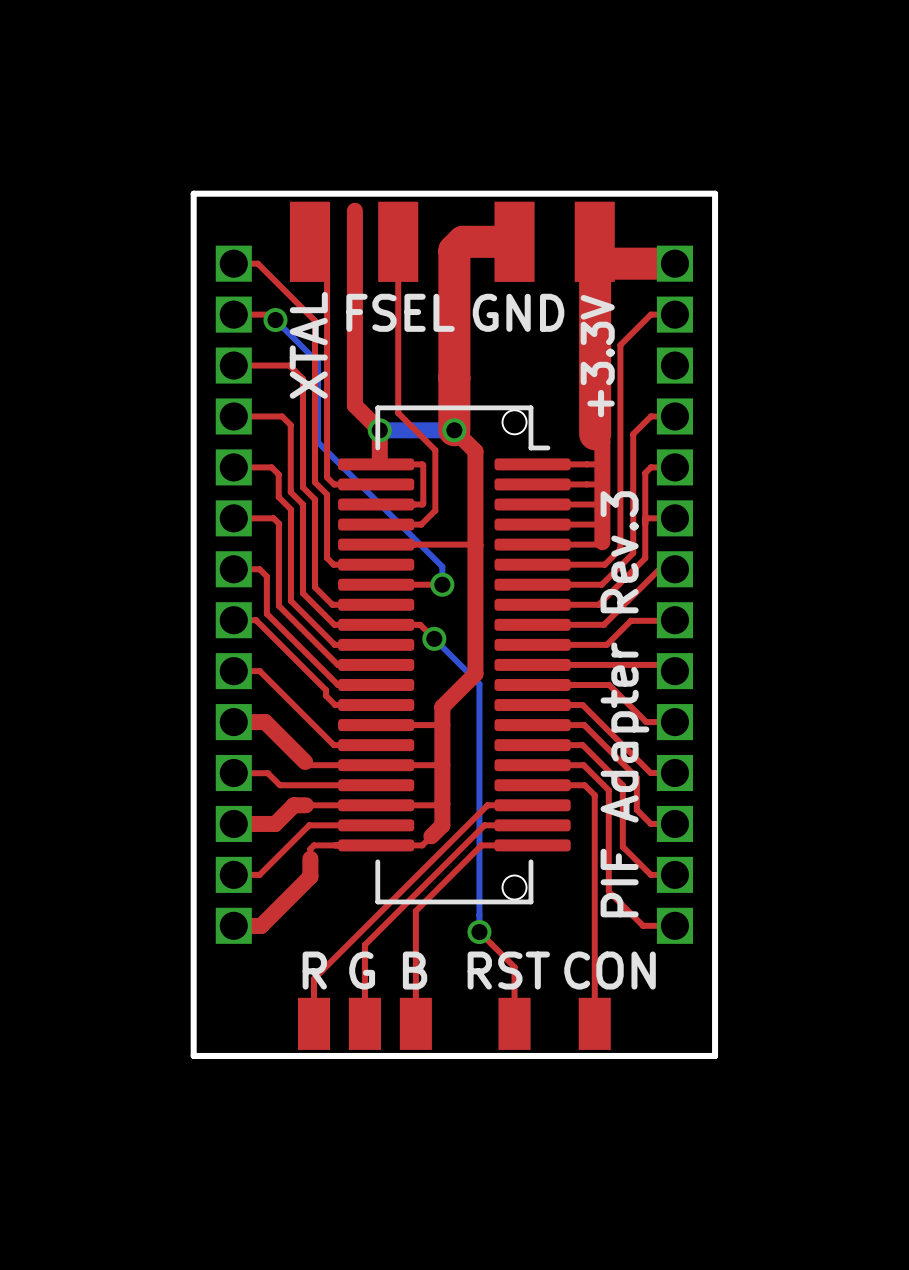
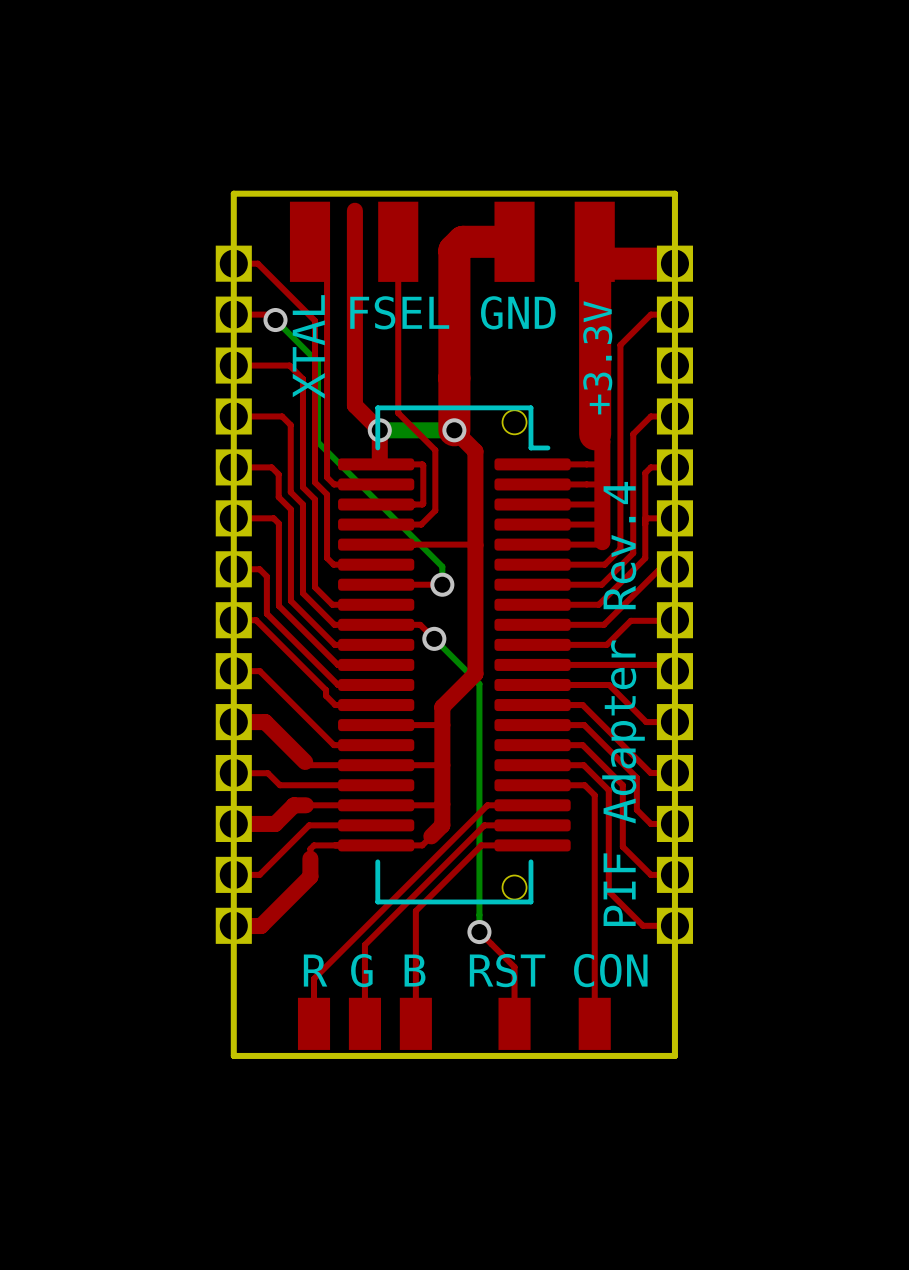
board edge: (233, 193) (193, 193) (193, 1055) (233, 1055) -> (233, 193) (233, 1055)
board edge: (674, 193) (715, 193) (715, 1055) (674, 1055) -> (674, 193) (674, 1055)
text: PIF Adapter Rev.3 (624, 704) -> PIF Adapter Rev.4 (623, 703)

